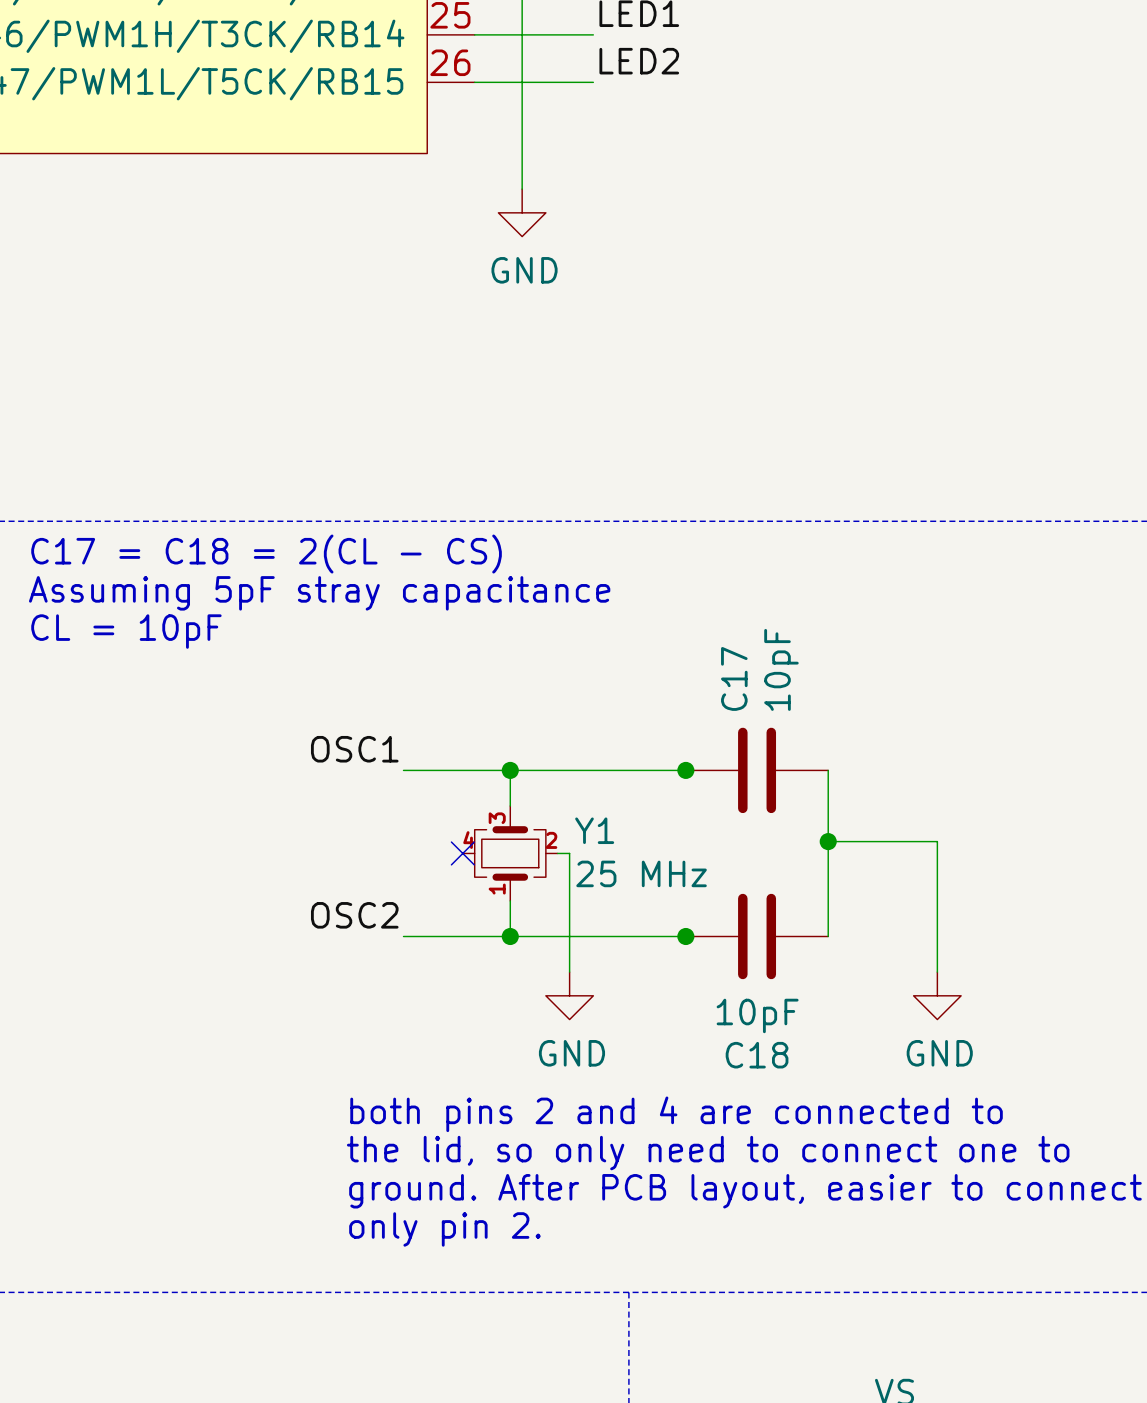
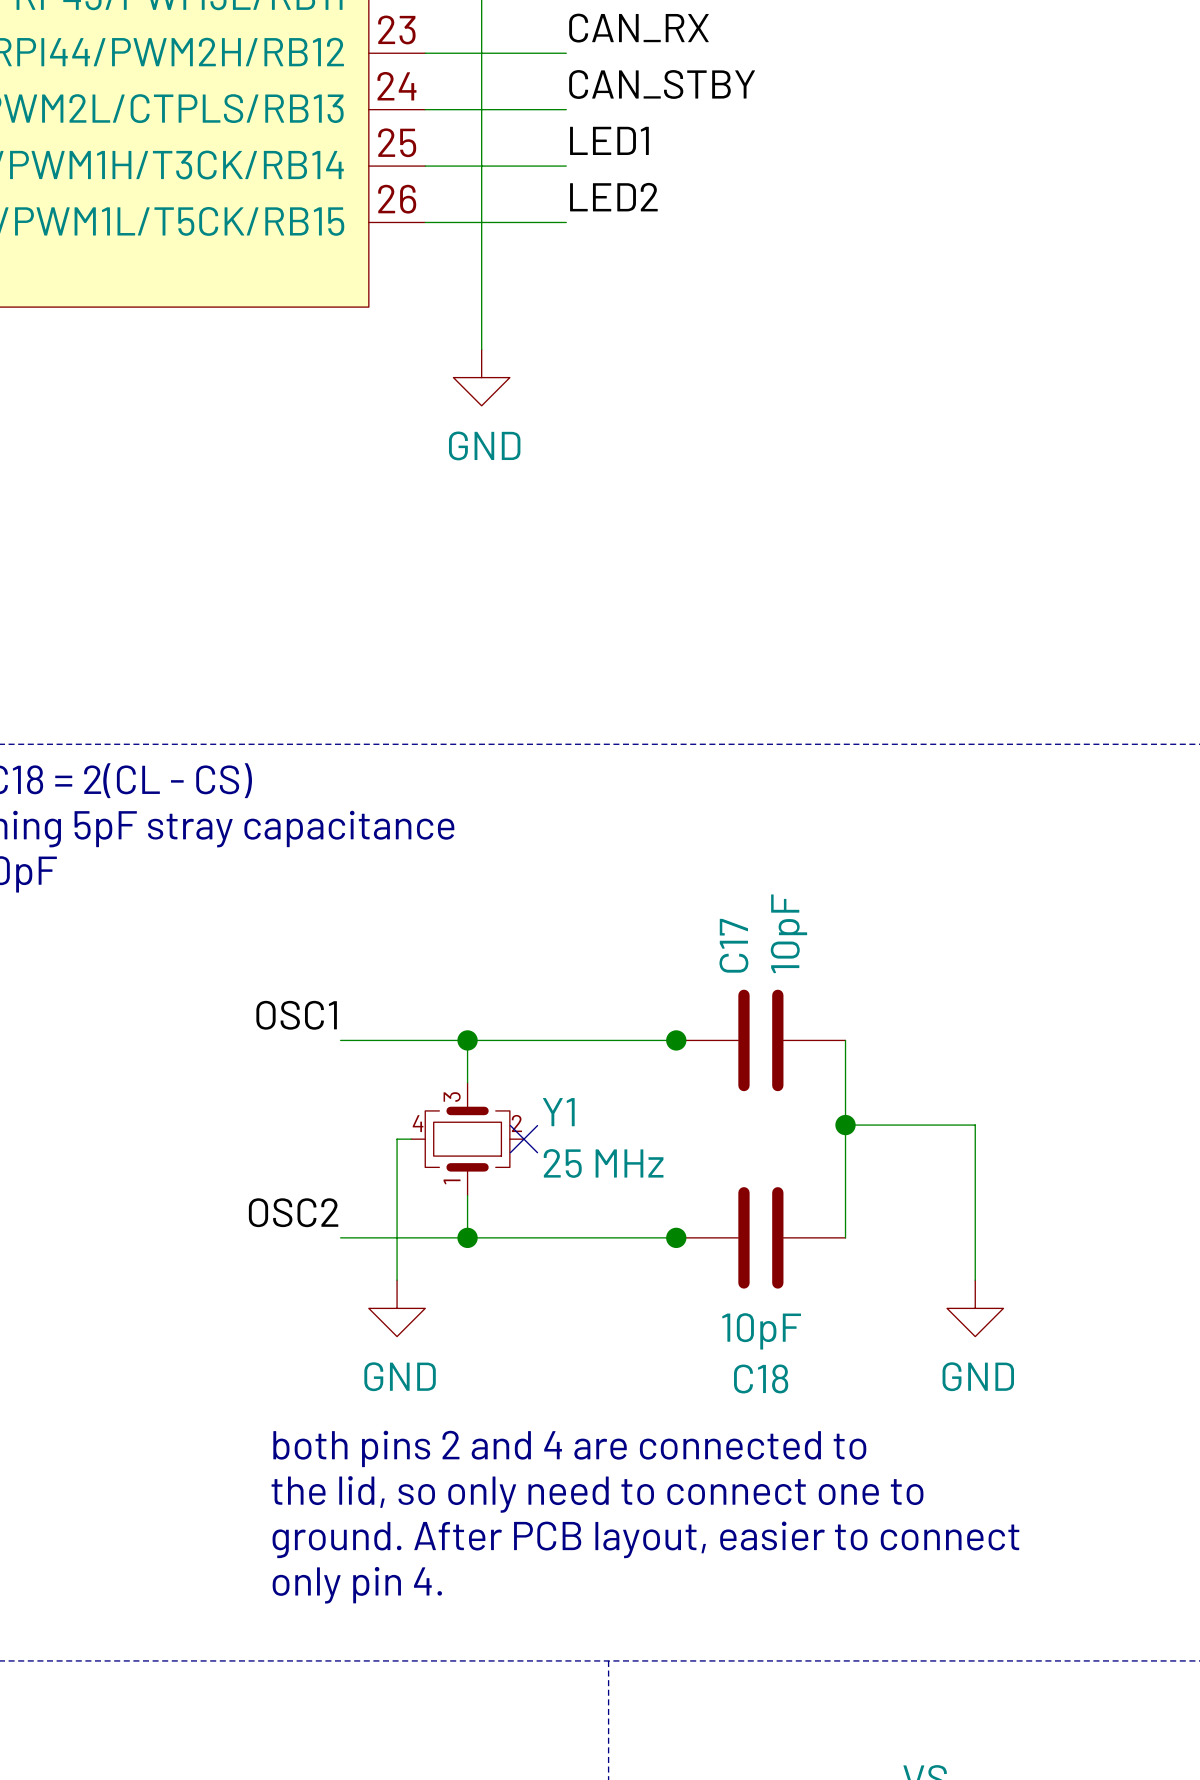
wire: none -> (411, 1139) (397, 1139) (397, 1280)
no-connect mark position: (462, 853) -> (523, 1139)
wire: (557, 853) (569, 853) (569, 972) -> none
power symbol position: GND (569, 995) -> GND (397, 1308)
text: only pin 2. (444, 1229) -> only pin 4. (357, 1585)

